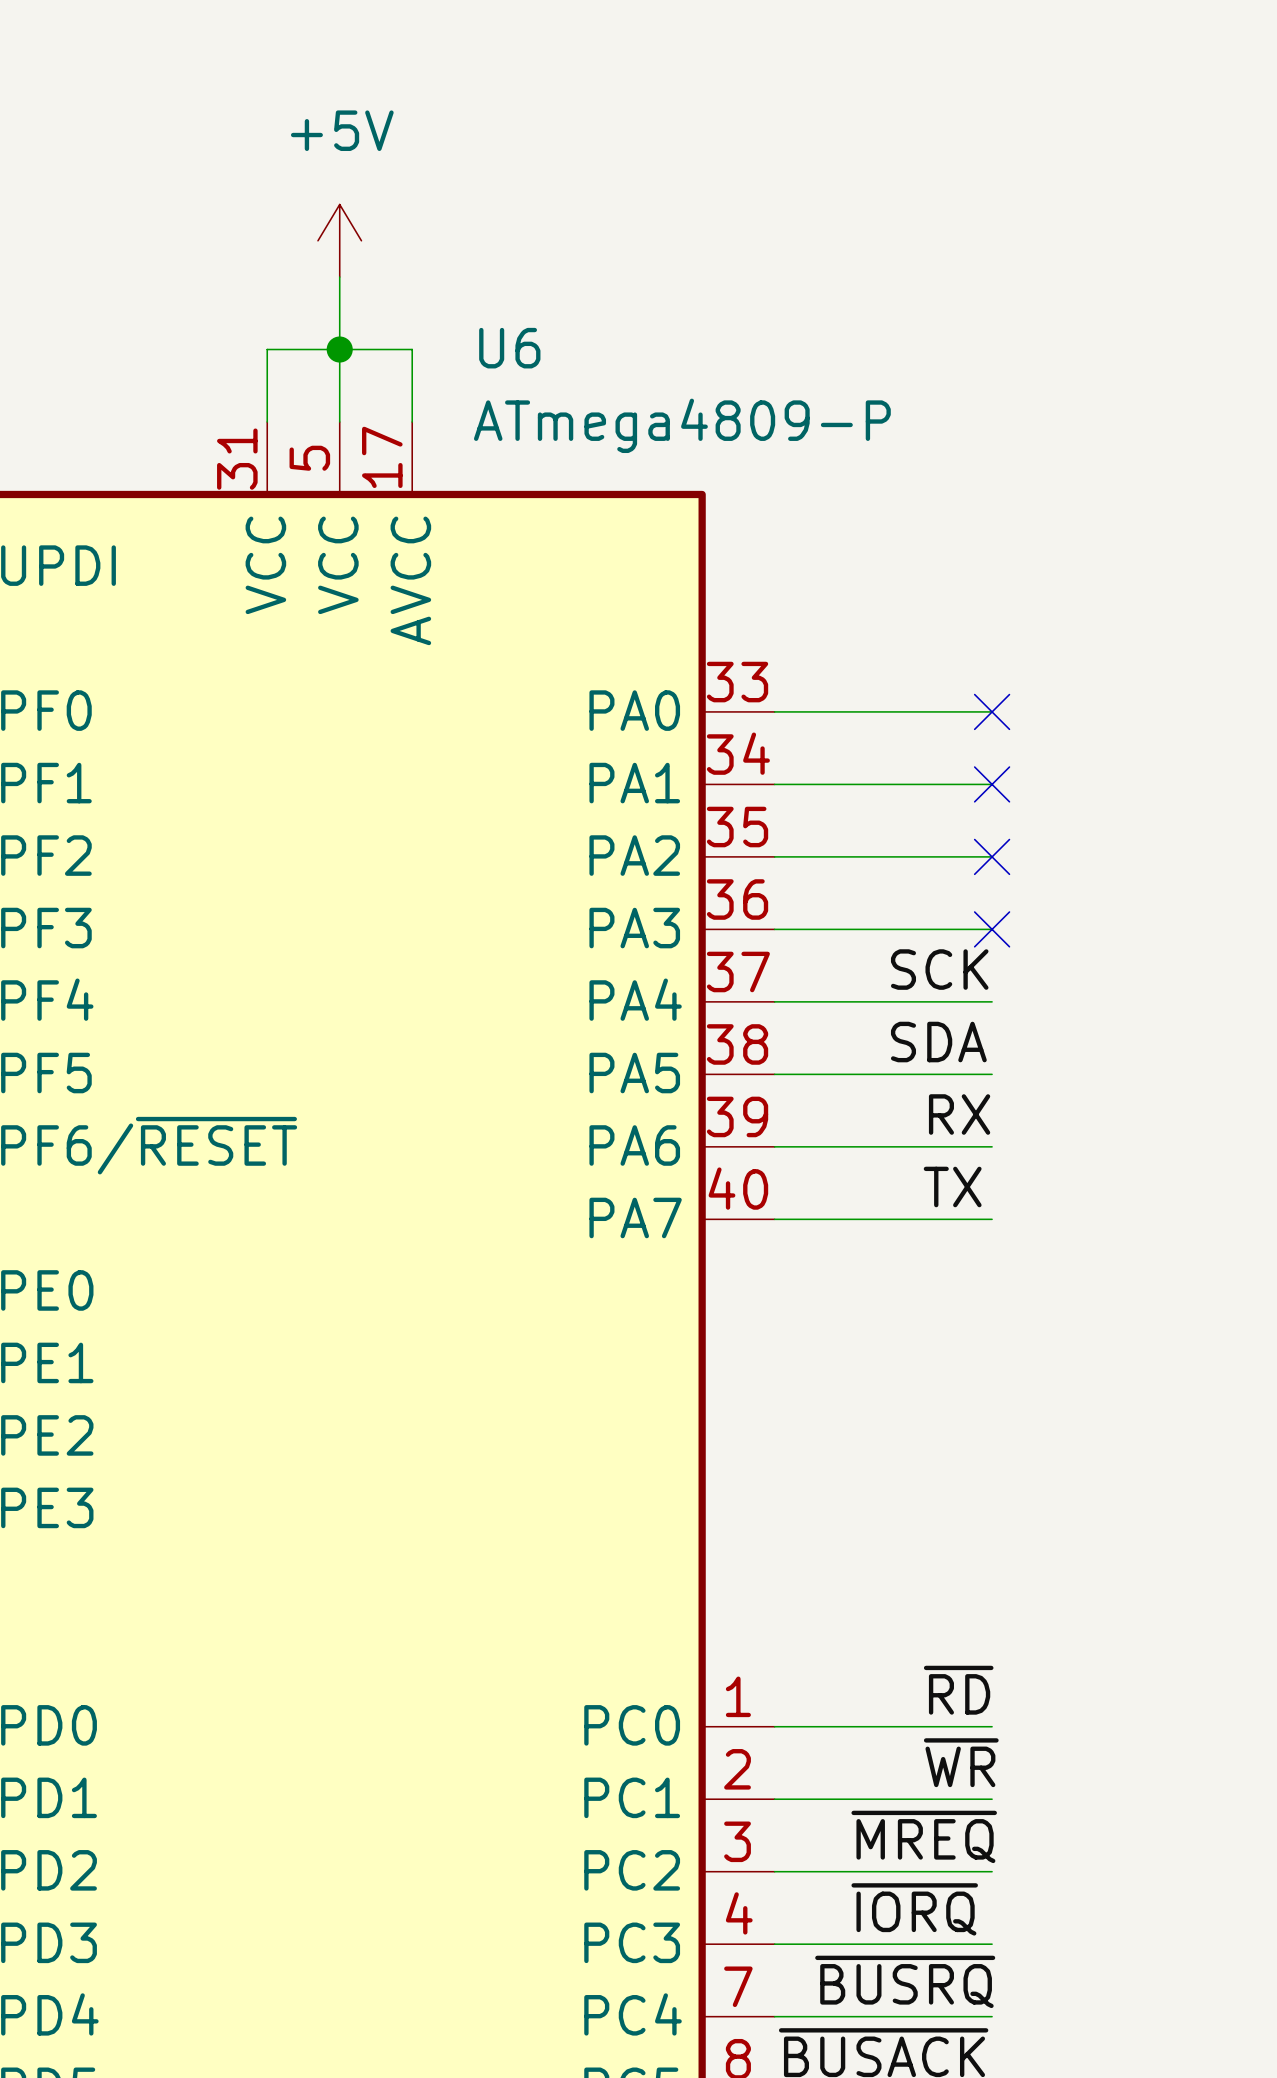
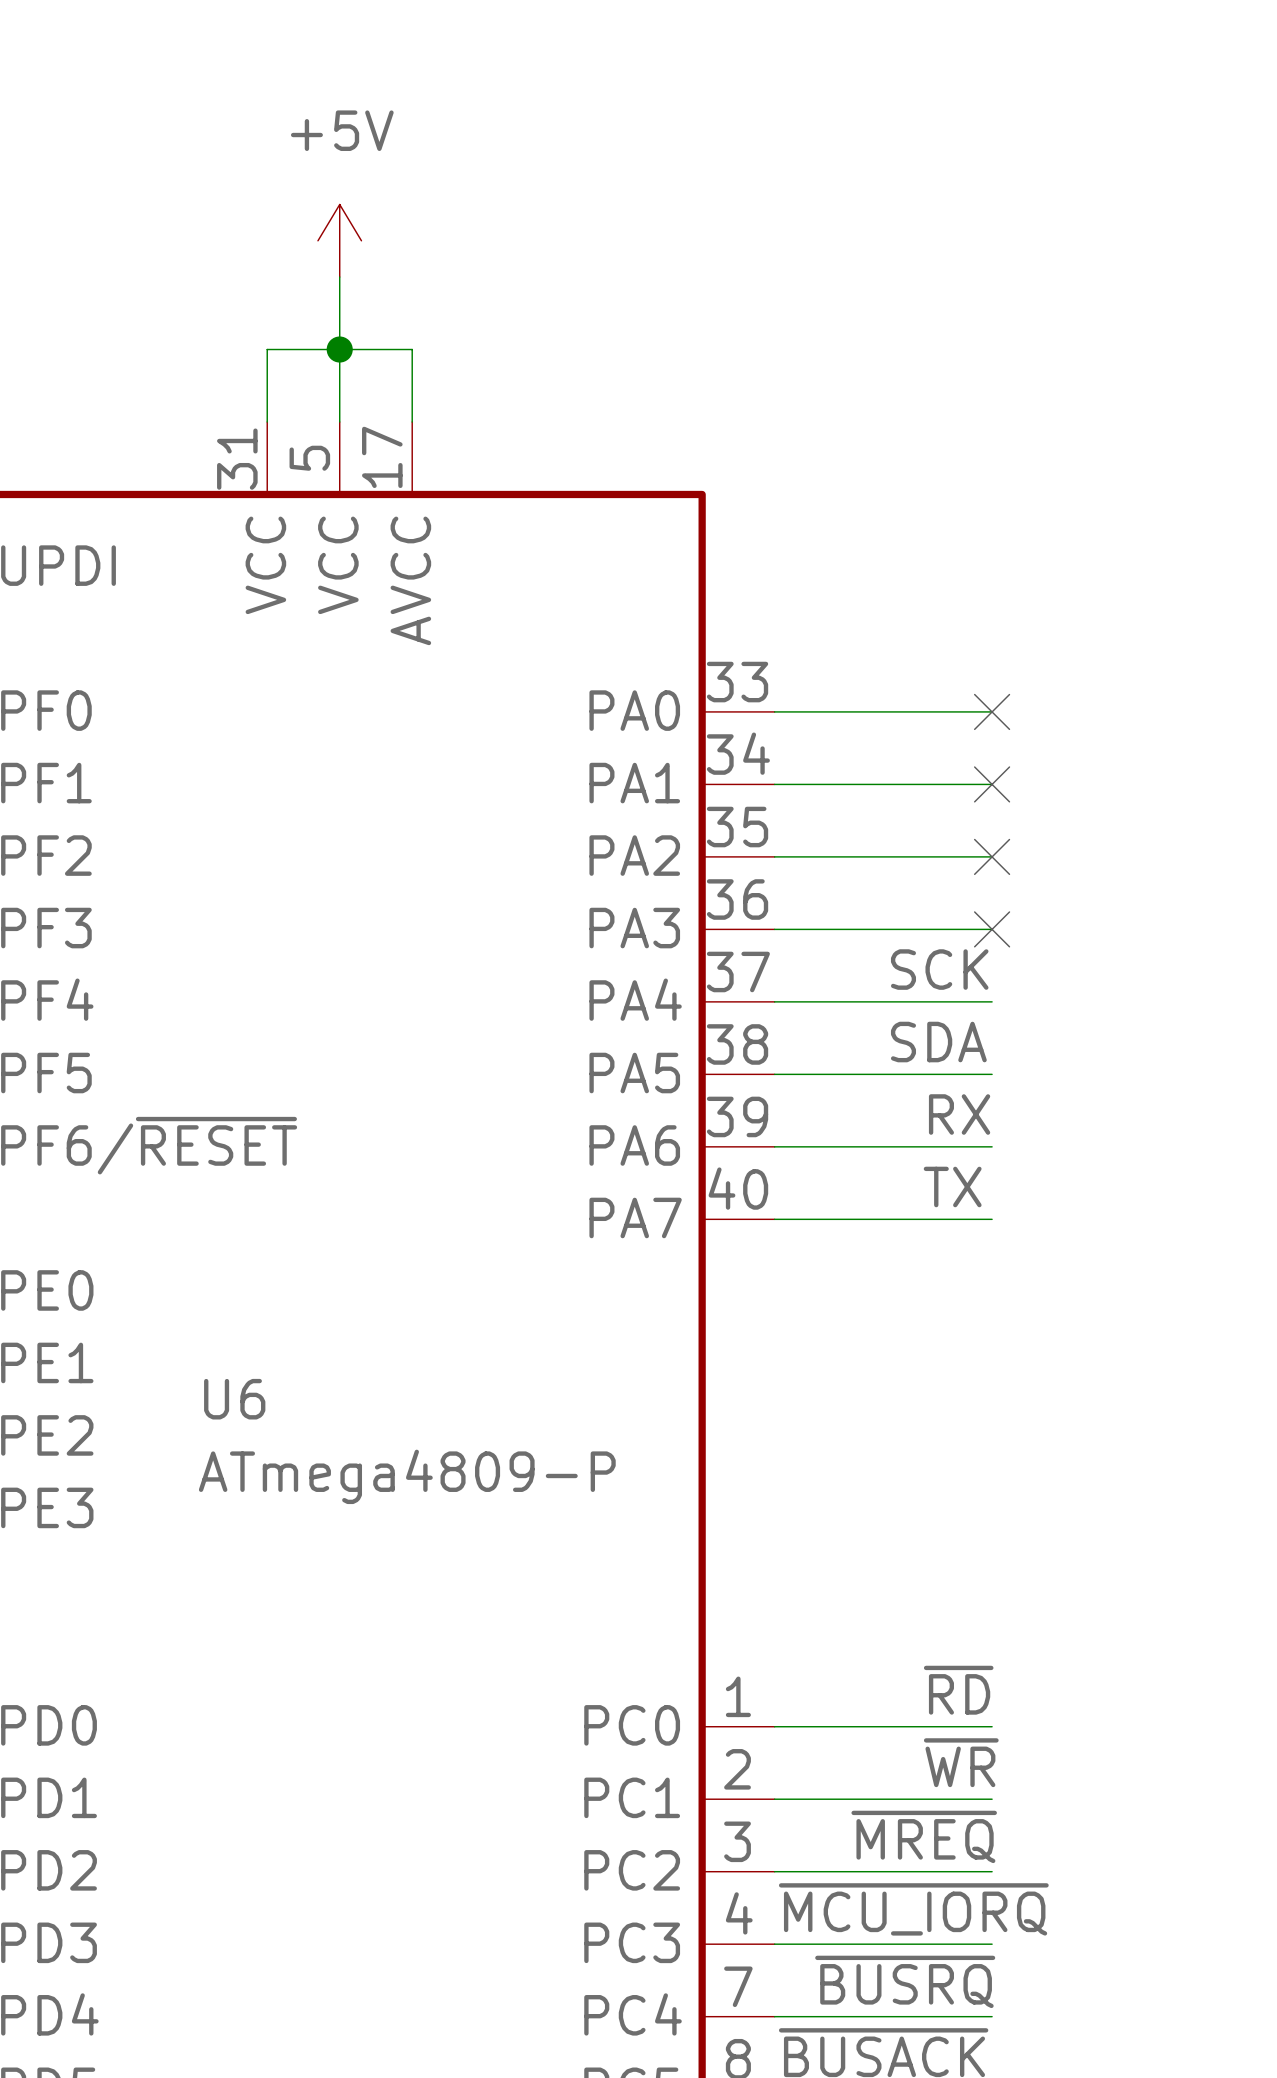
U6 name position: U6 (509, 348) -> U6 (234, 1399)
U6 value position: ATmega4809-P (682, 425) -> ATmega4809-P (407, 1476)
label: ~{IORQ} (914, 1909) -> ~{MCU_IORQ} (913, 1909)

